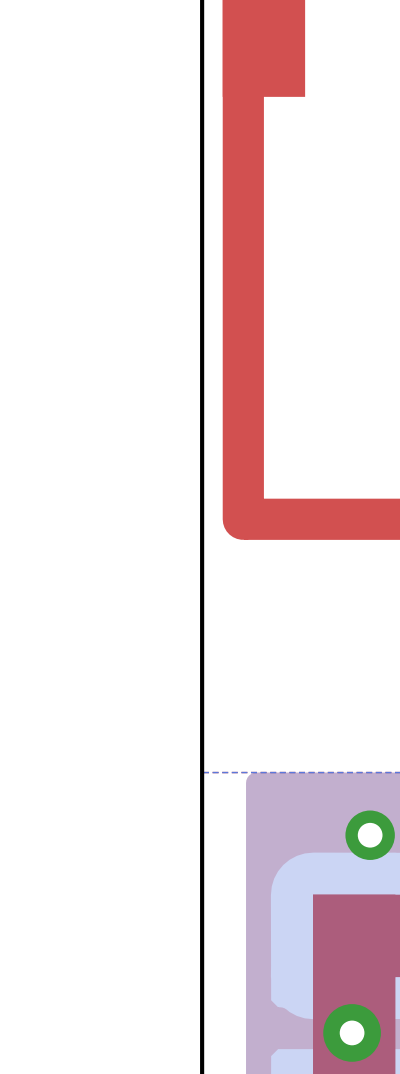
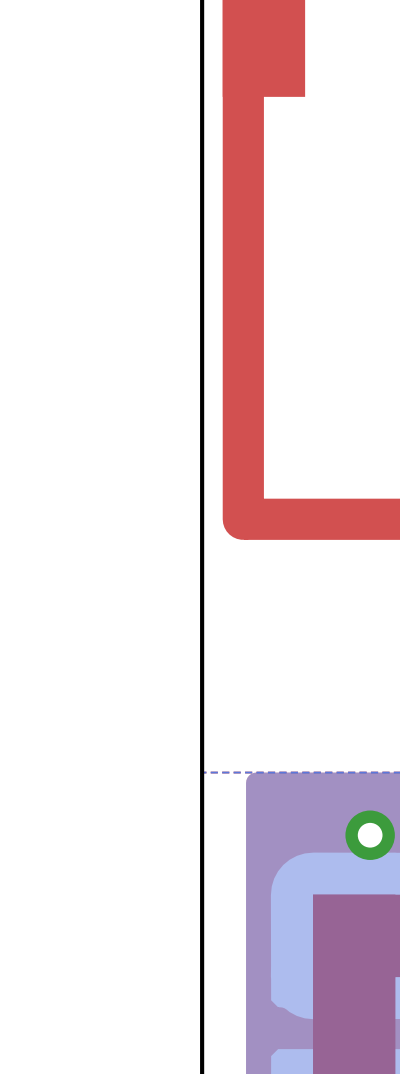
via: (352, 1032) -> none

